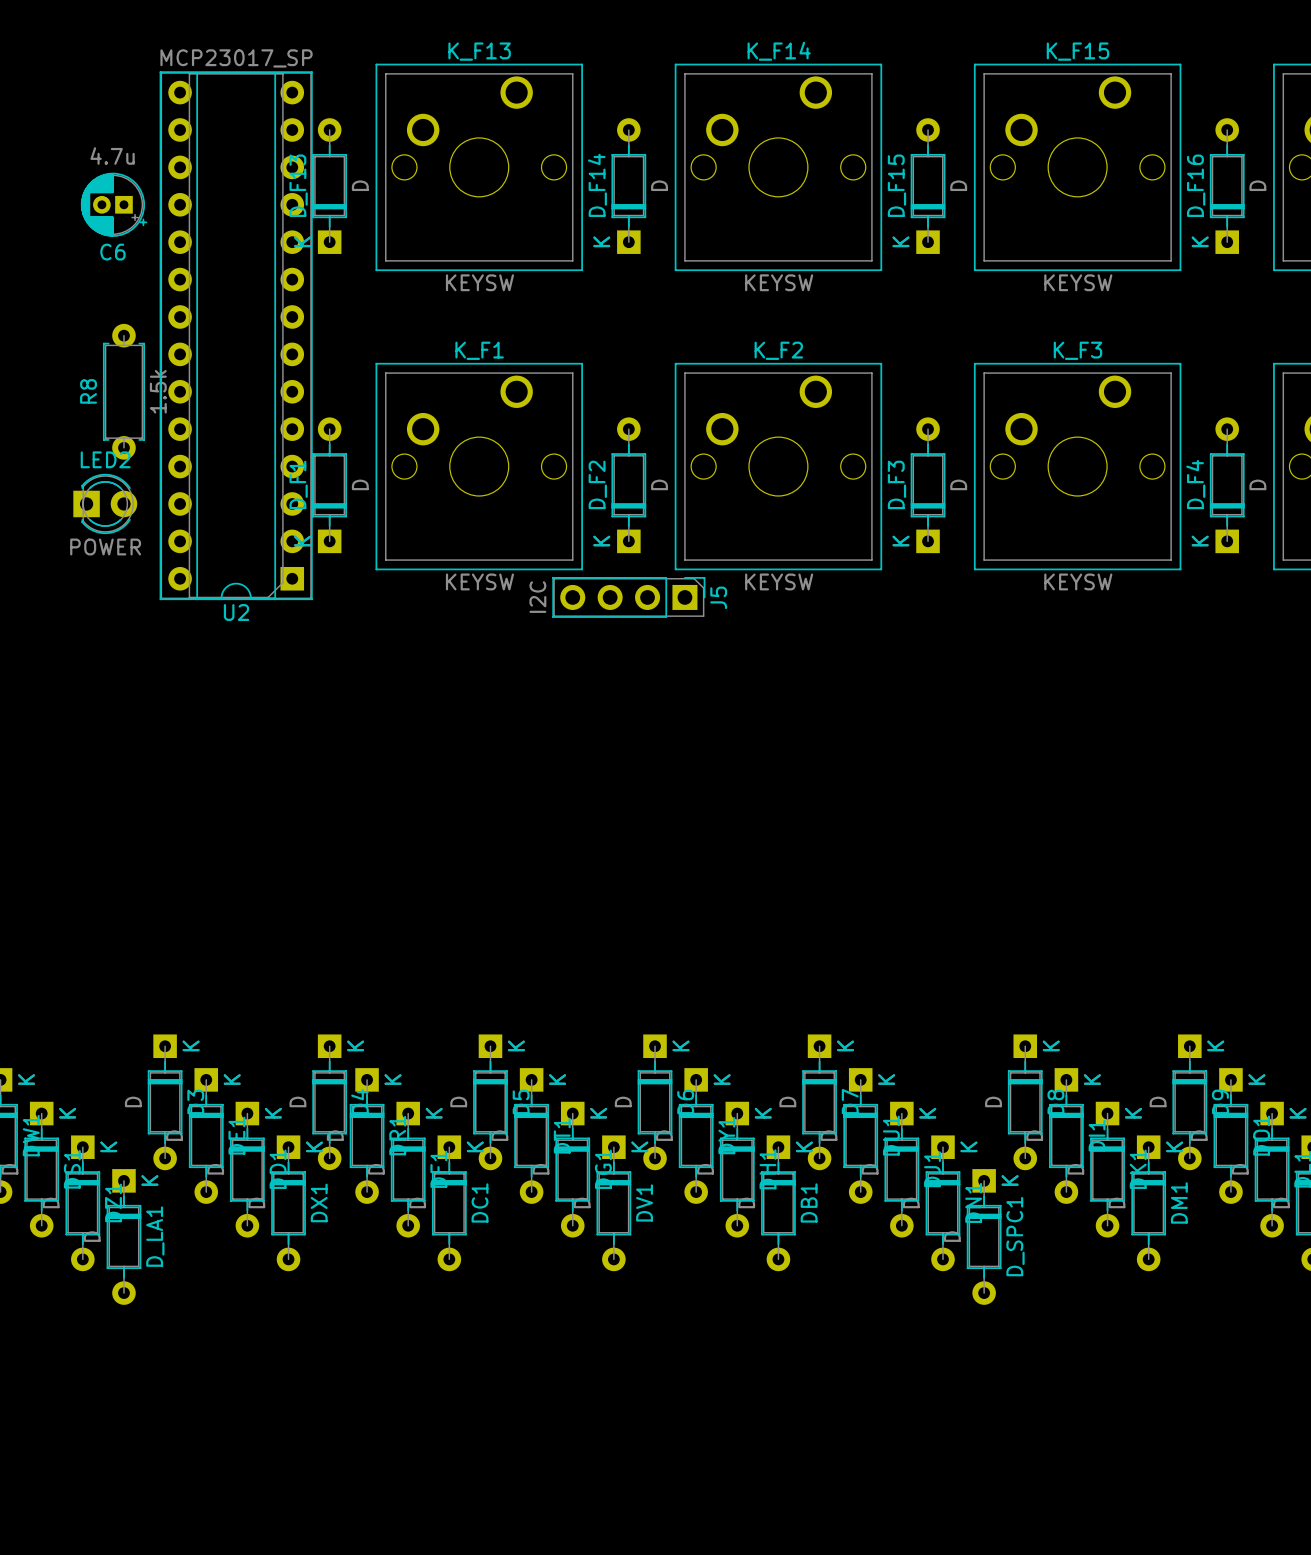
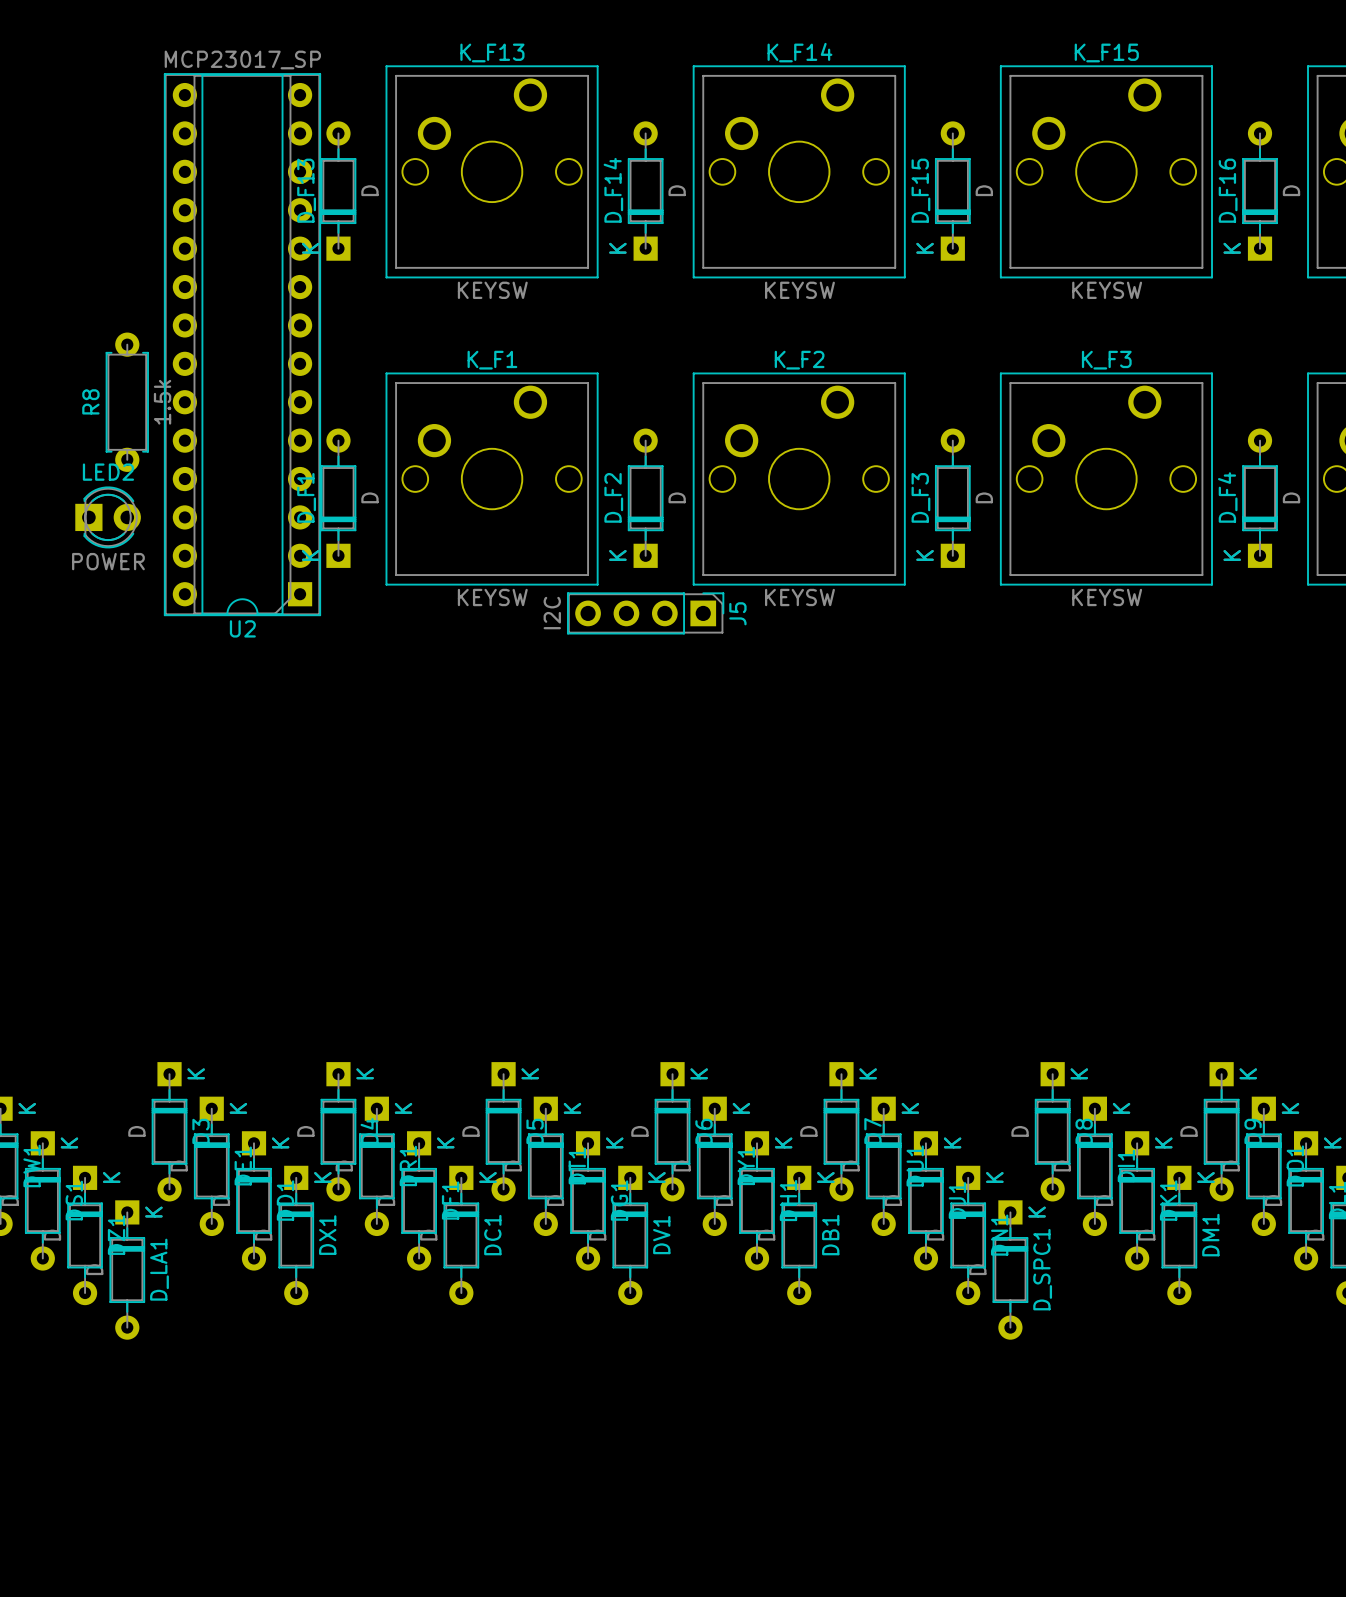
C6: 4.7u (114, 204) -> none

